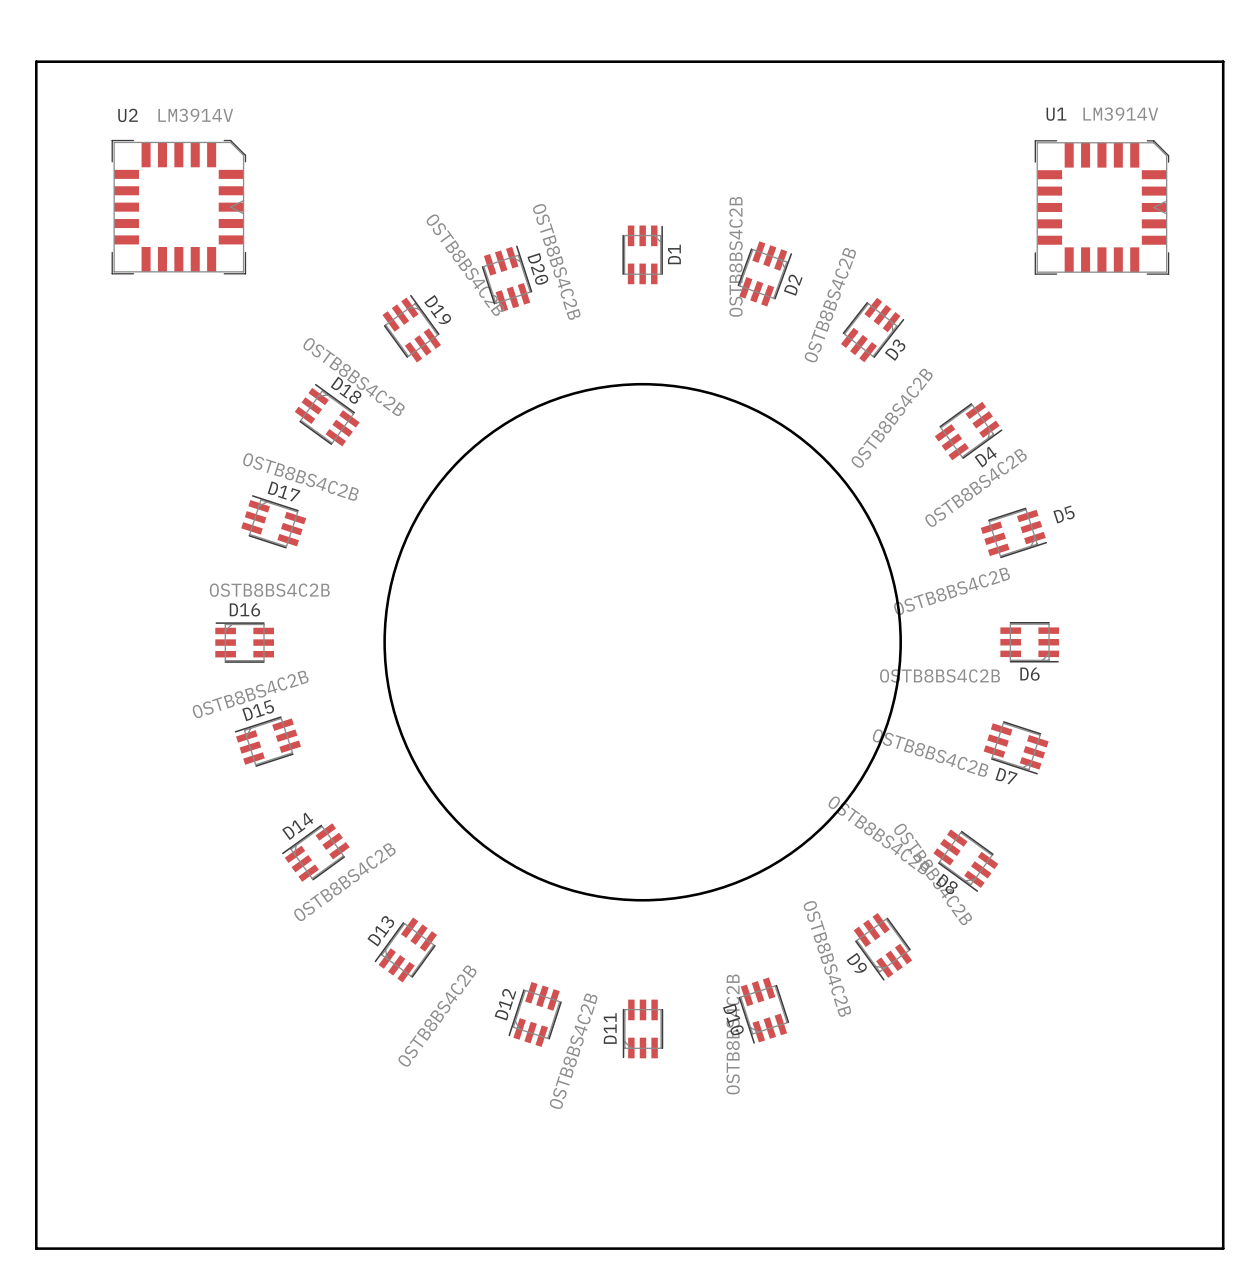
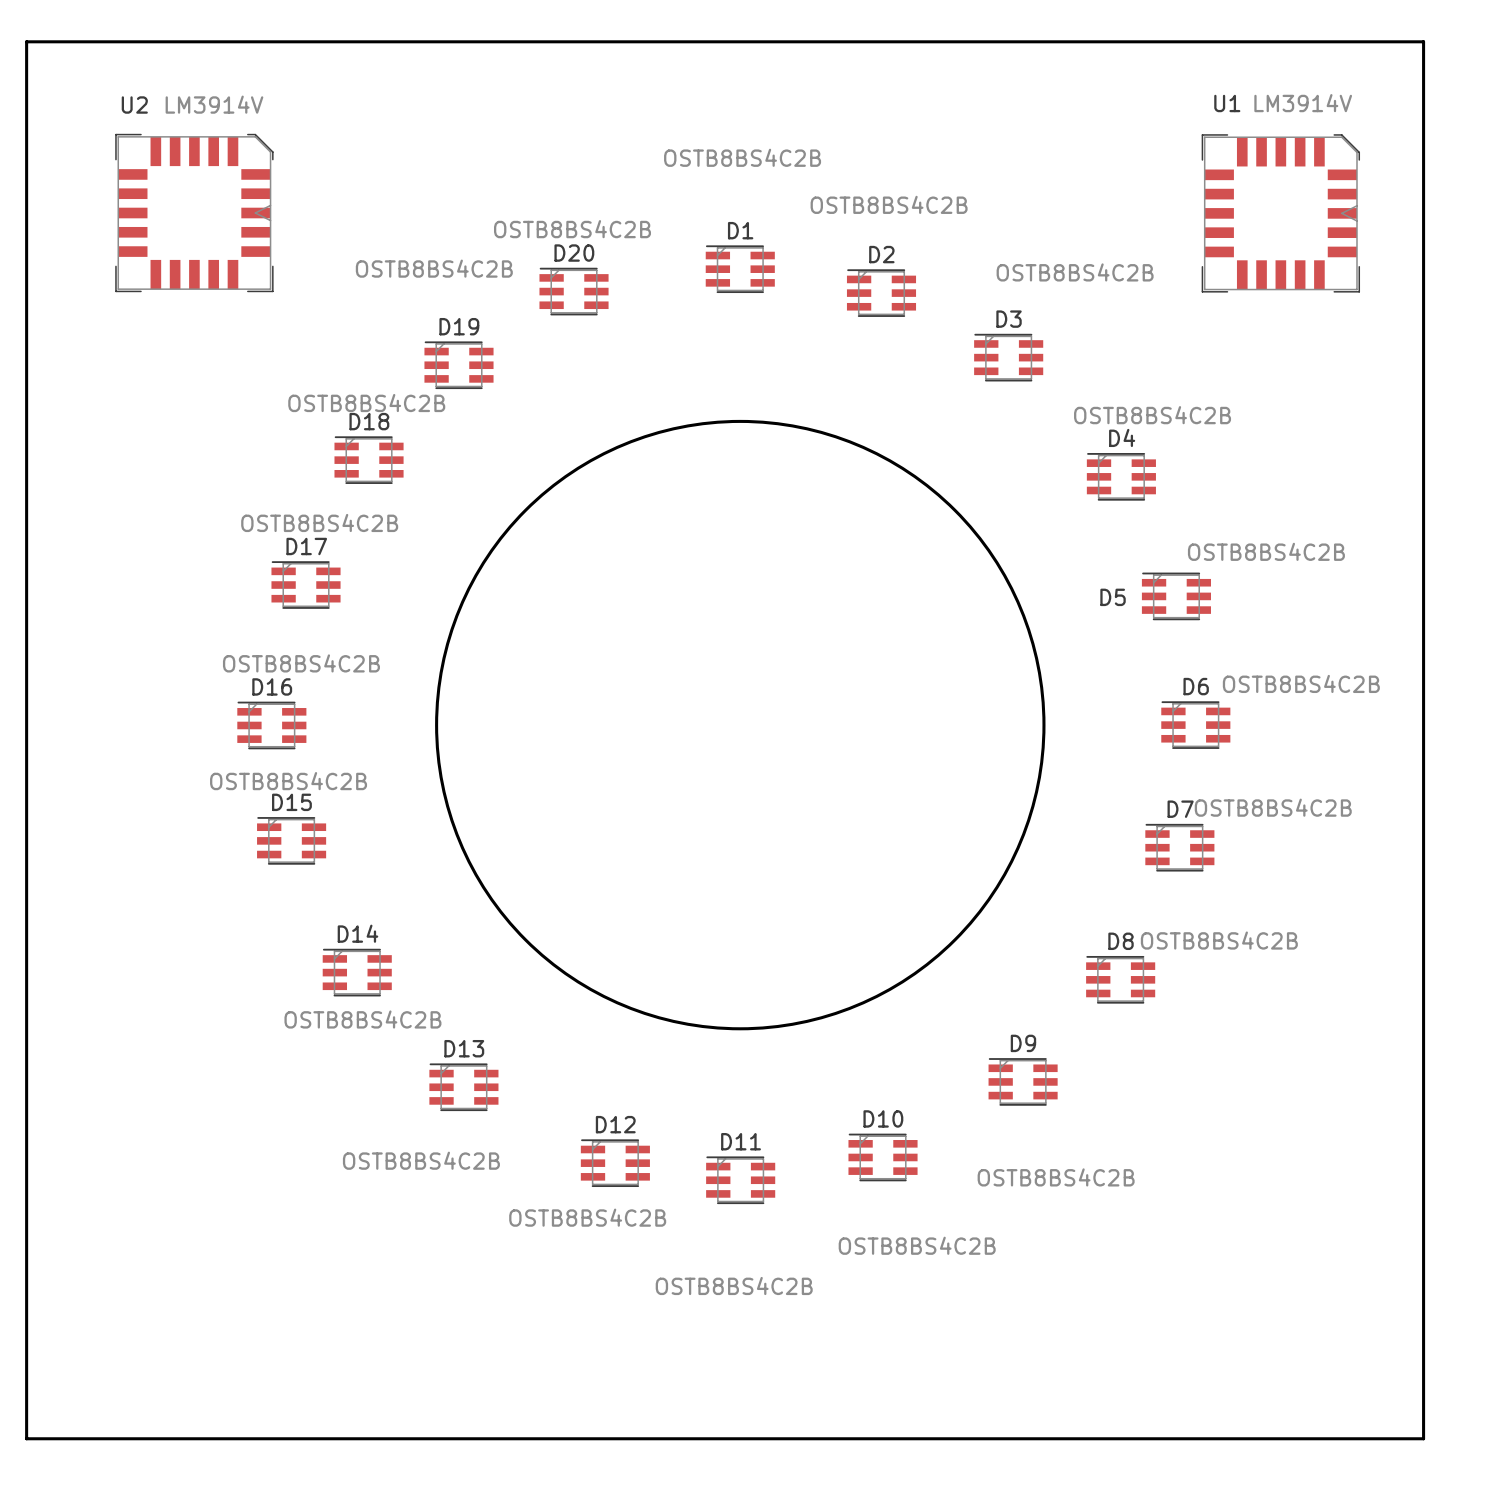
D1 rotation: 0° (642, 254) -> 90° counterclockwise (740, 269)
D2 rotation: 0° (764, 273) -> 110° counterclockwise (881, 293)
D20 rotation: 0° (507, 278) -> 72° counterclockwise (574, 291)
D19 rotation: 0° (411, 328) -> 54° counterclockwise (458, 365)
D3 rotation: 0° (872, 330) -> 128° counterclockwise (1008, 357)
D18 rotation: 0° (327, 415) -> 36° counterclockwise (369, 460)
D4 rotation: 0° (968, 431) -> 144° counterclockwise (1121, 476)
D17 rotation: 0° (273, 521) -> 18° counterclockwise (306, 585)
D5 rotation: 0° (1013, 532) -> 162° counterclockwise (1176, 596)
D6 rotation: 0° (1029, 642) -> 180° (1195, 725)
D15 rotation: 0° (267, 741) -> 18° clockwise (291, 840)
D7 rotation: 0° (1016, 747) -> 162° clockwise (1179, 847)
D14 rotation: 0° (315, 852) -> 36° clockwise (357, 972)
D8 rotation: 0° (965, 860) -> 144° clockwise (1120, 979)
D9 rotation: 0° (882, 946) -> 126° clockwise (1023, 1081)
D13 rotation: 0° (405, 949) -> 54° clockwise (463, 1087)
D10 rotation: 0° (763, 1010) -> 108° clockwise (883, 1157)
D12 rotation: 0° (535, 1014) -> 72° clockwise (615, 1163)
D11 rotation: 0° (642, 1028) -> 90° clockwise (740, 1180)

